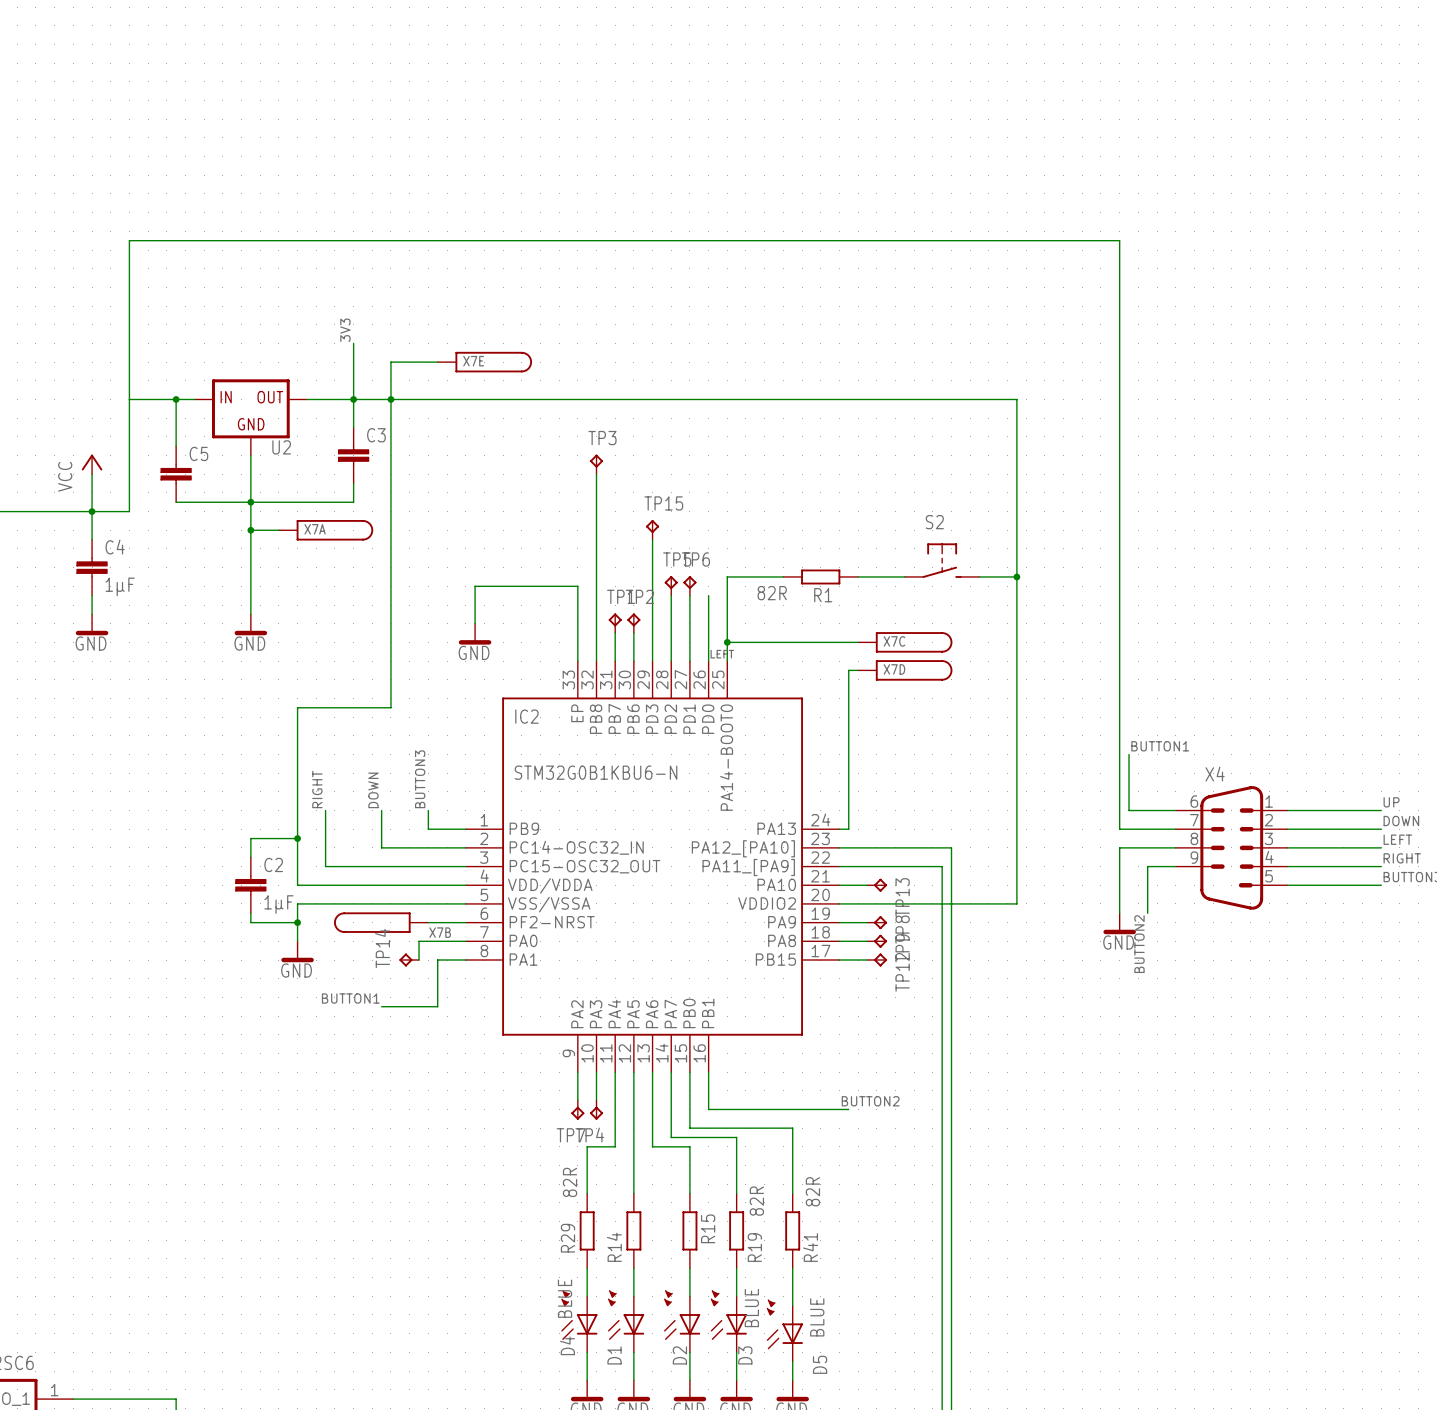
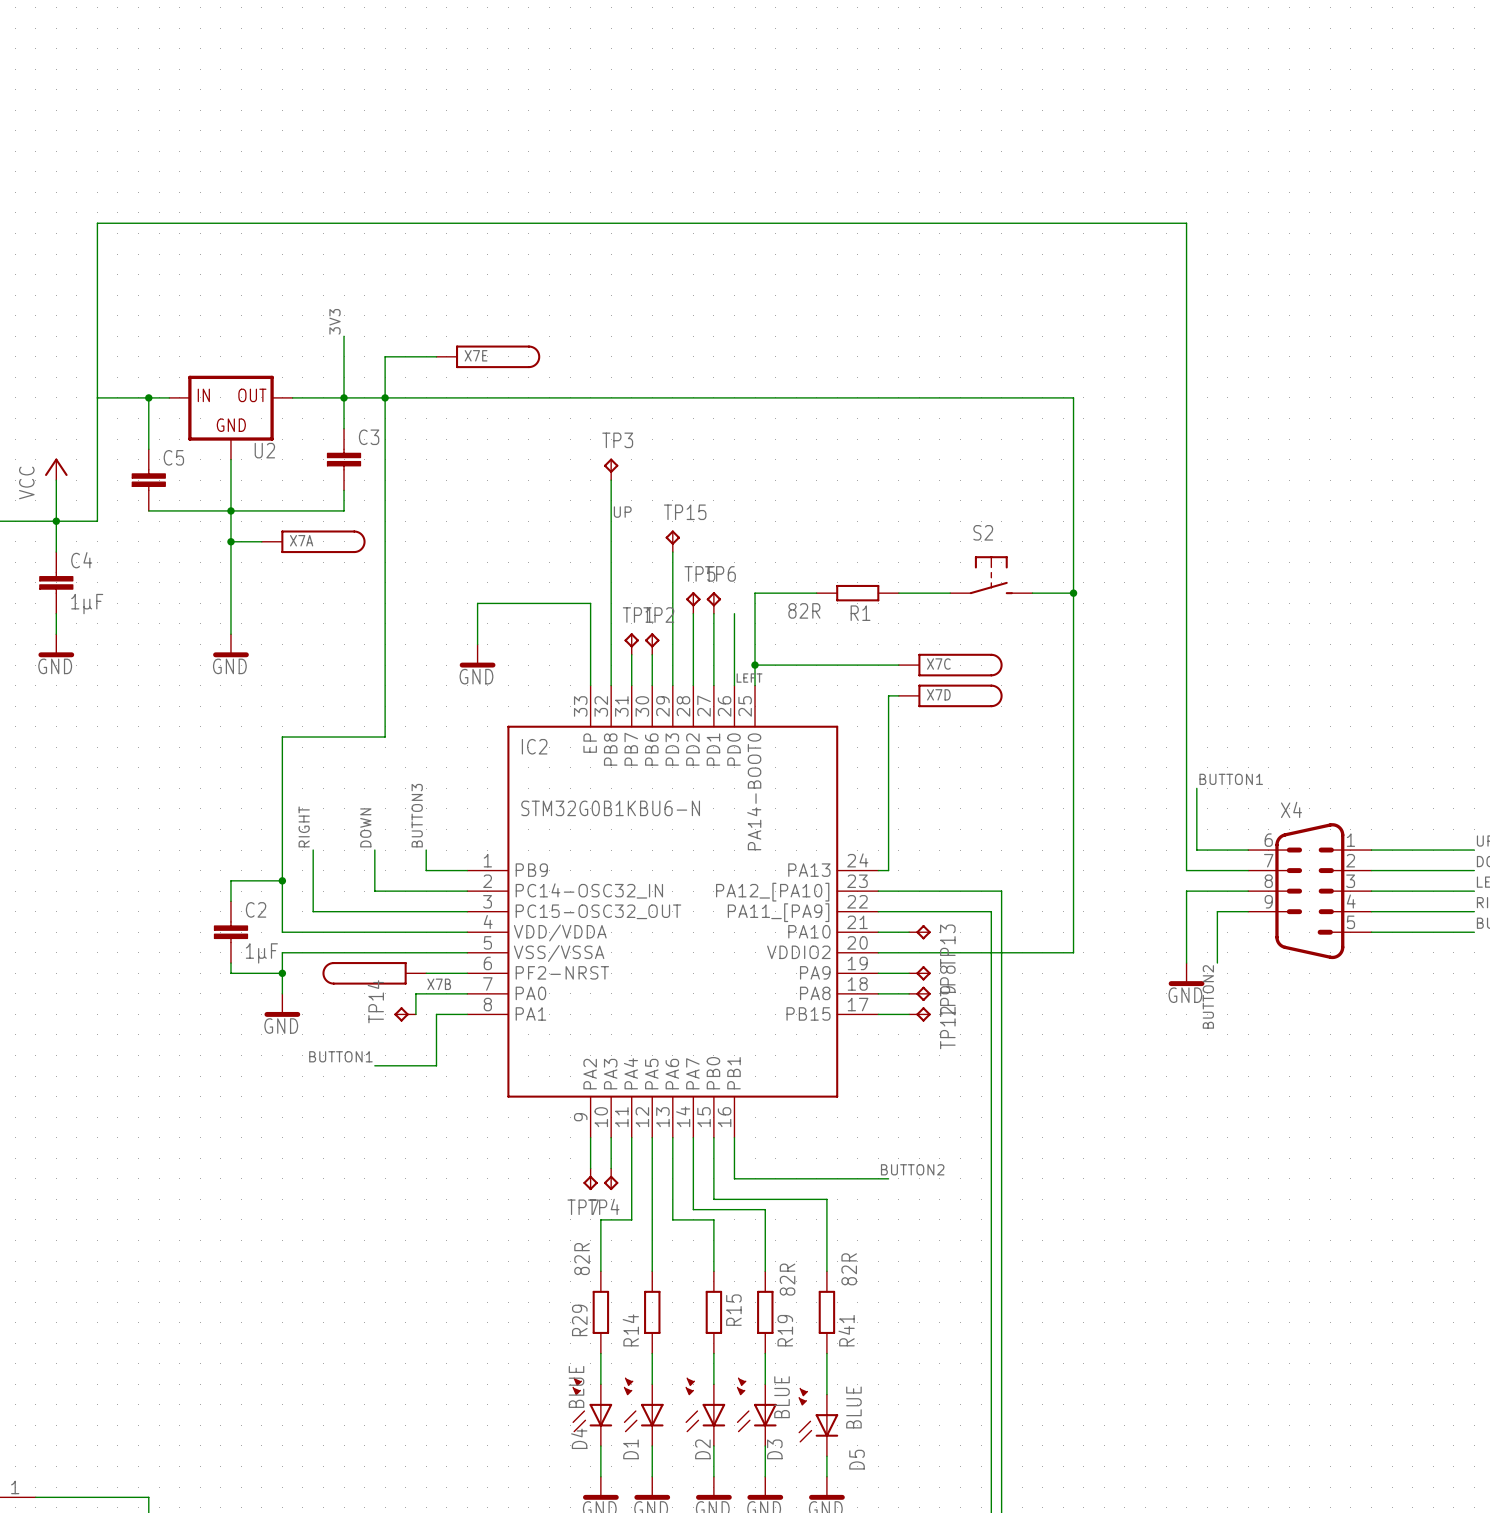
label: none -> UP (622, 512)

